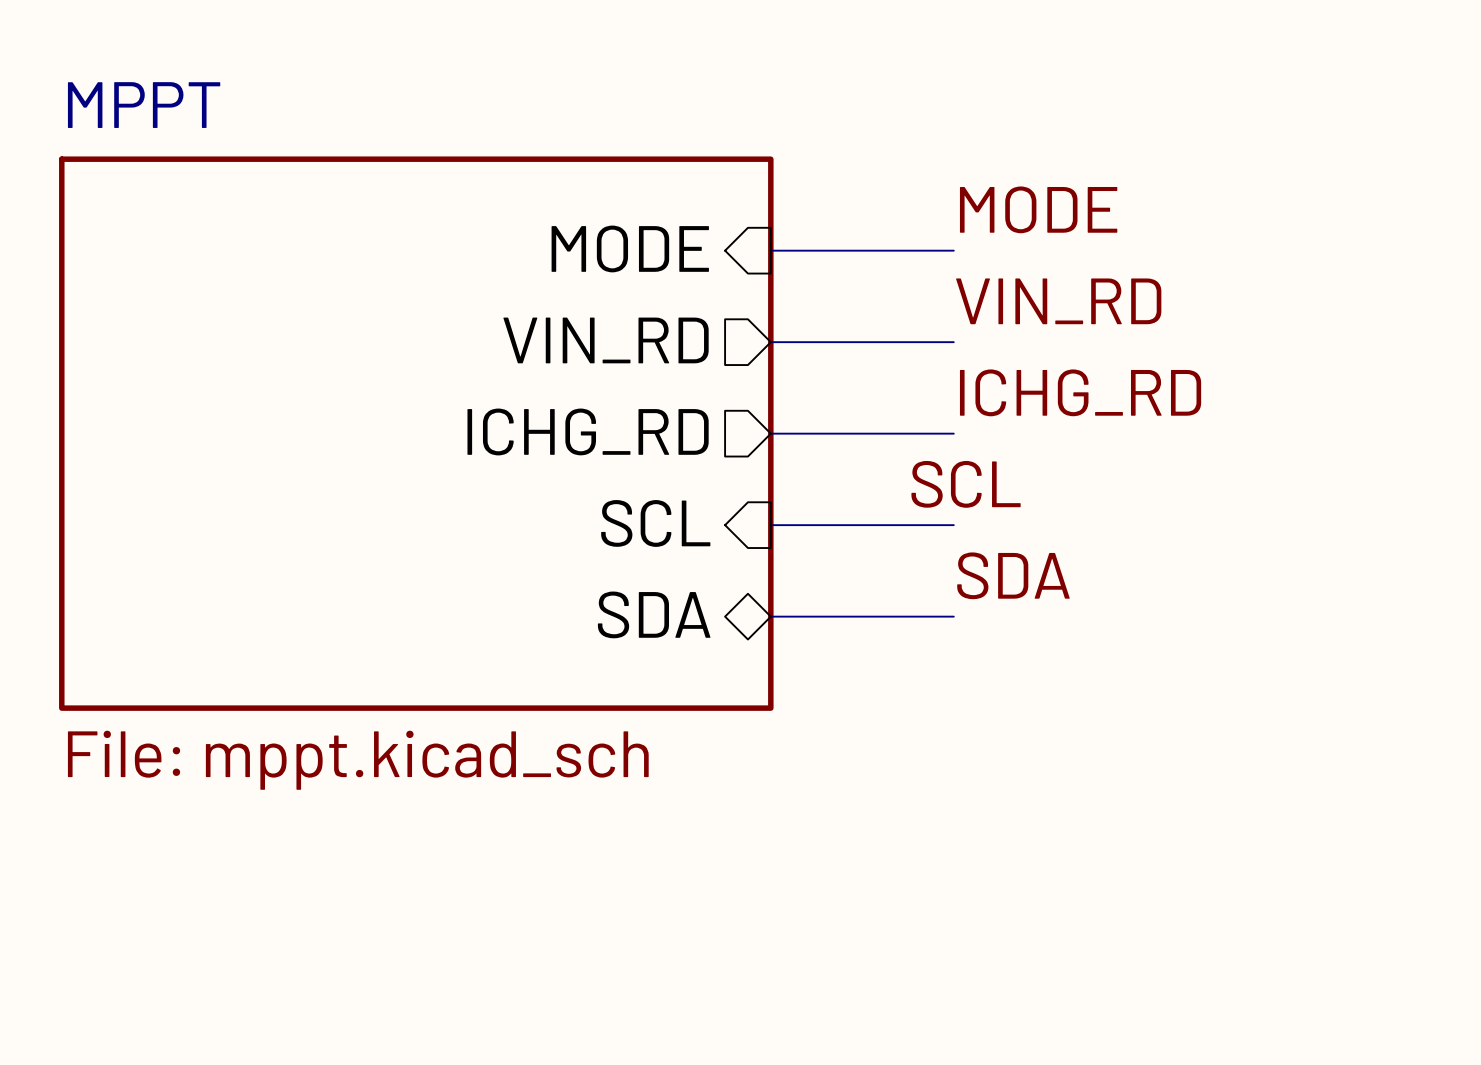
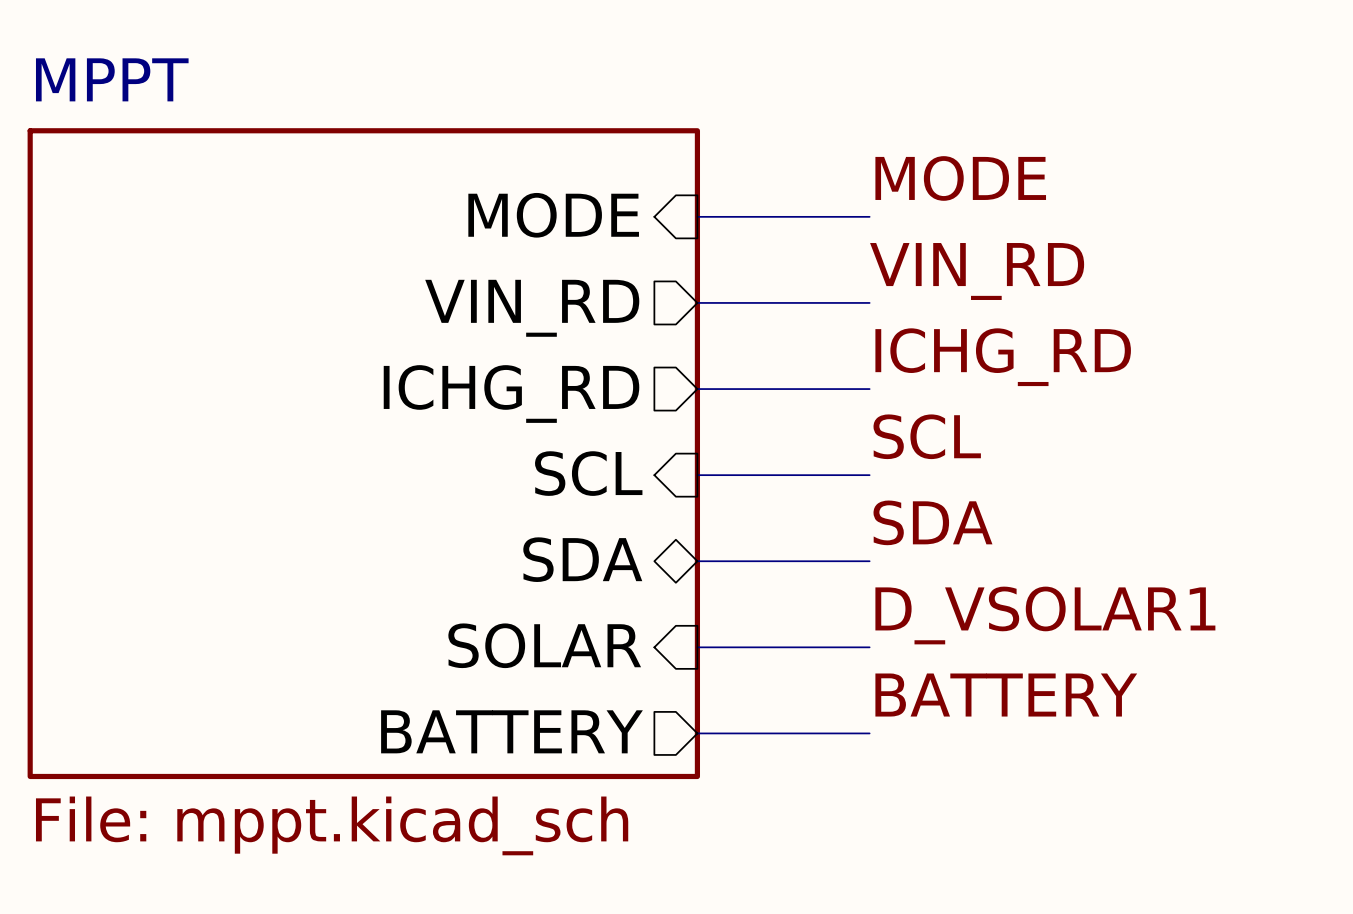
sheet MPPT: File: mppt.kicad_sch (416, 433) -> none
label position: SCL (966, 484) -> SCL (927, 436)
sheet MPPT: none -> File: mppt.kicad_sch (363, 453)
label: none -> D_VSOLAR1 (1045, 615)
sheet pin: none -> SOLAR (544, 645)
wire: none -> (697, 647) (869, 647)
label: none -> BATTERY (1006, 695)
sheet pin: none -> BATTERY (511, 731)
wire: none -> (697, 733) (869, 733)

